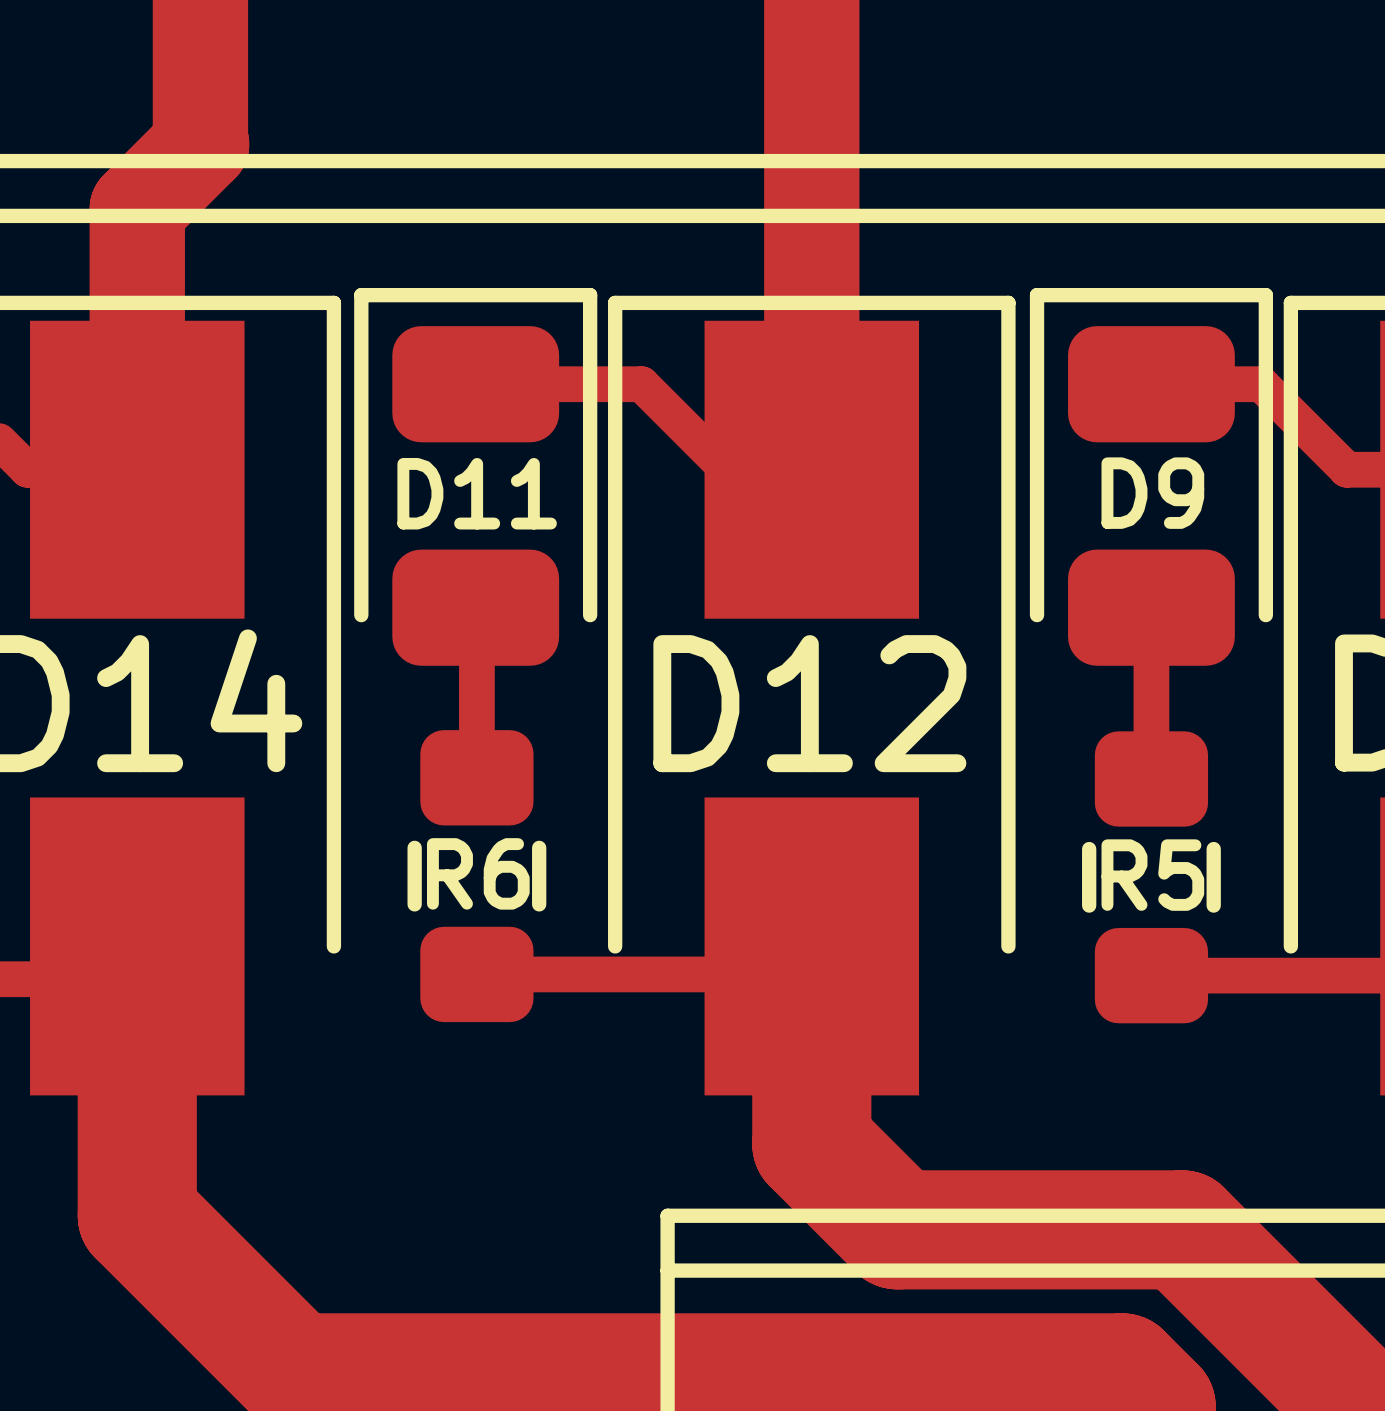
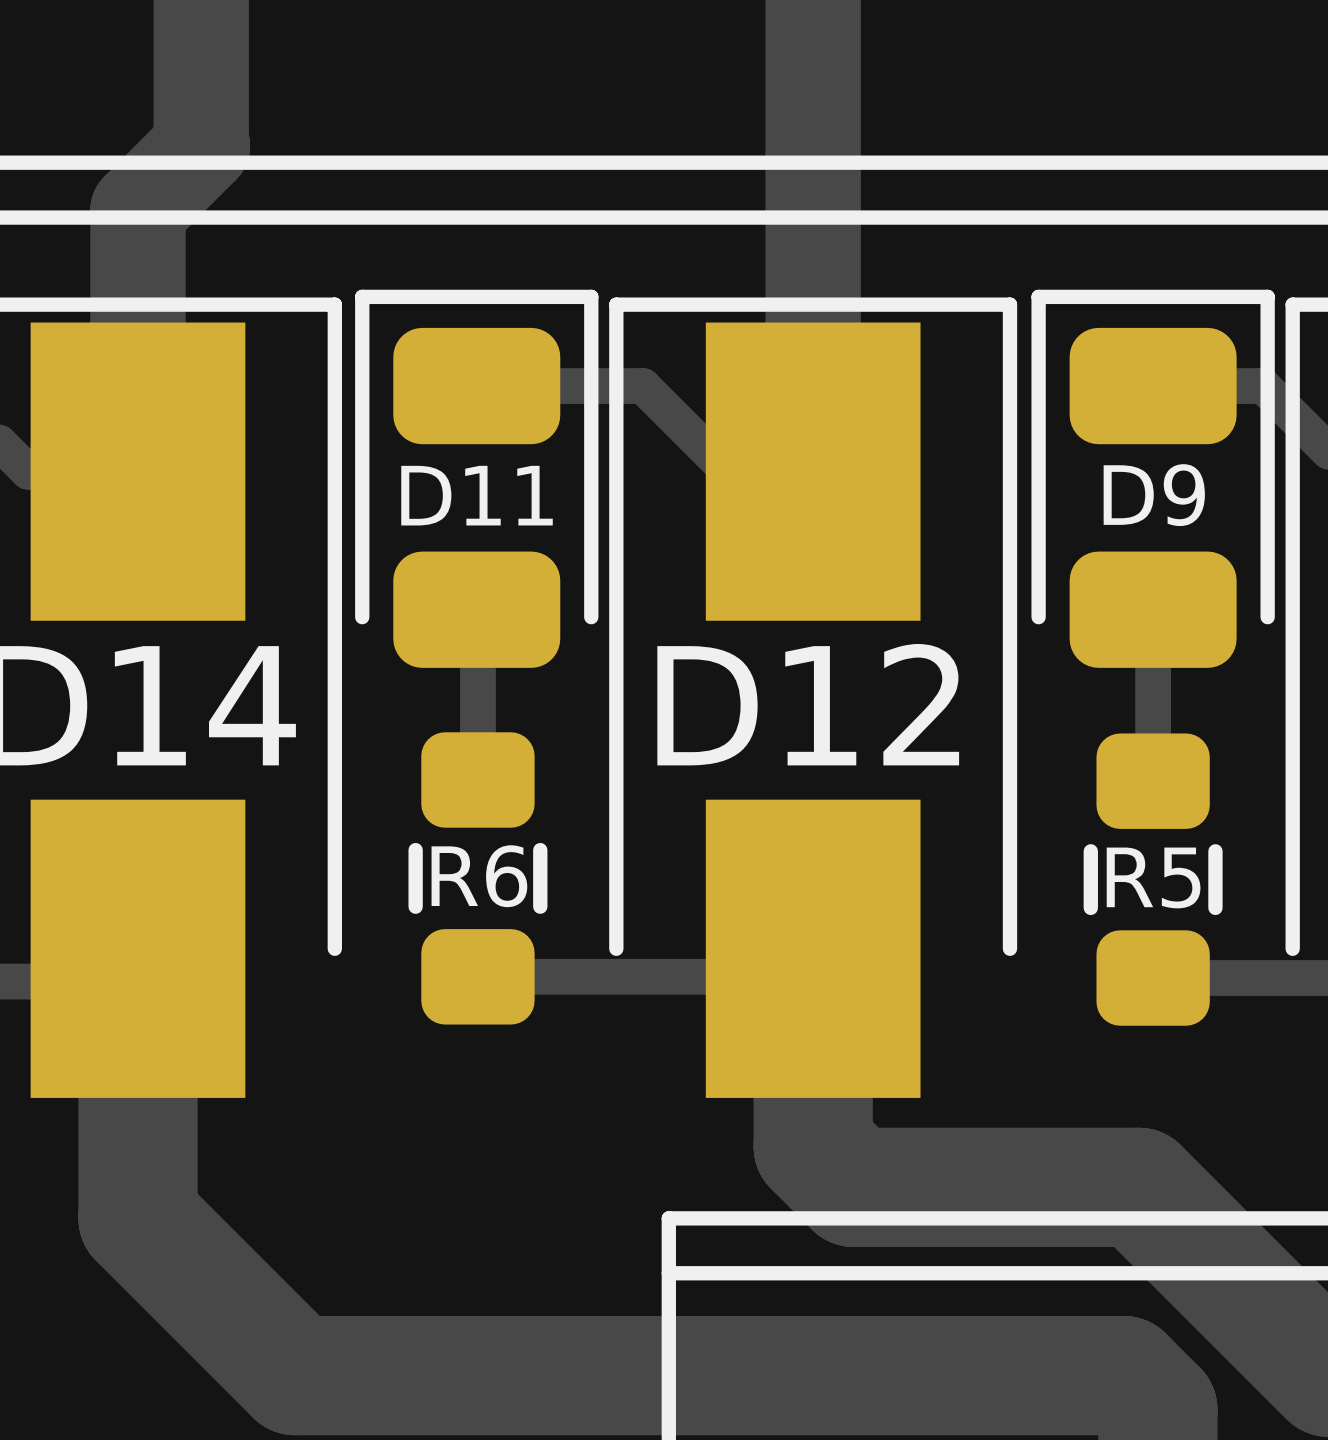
track: (852, 1184) (897, 1229) (1182, 1229) -> (853, 1187) (1138, 1187) (1183, 1232)

